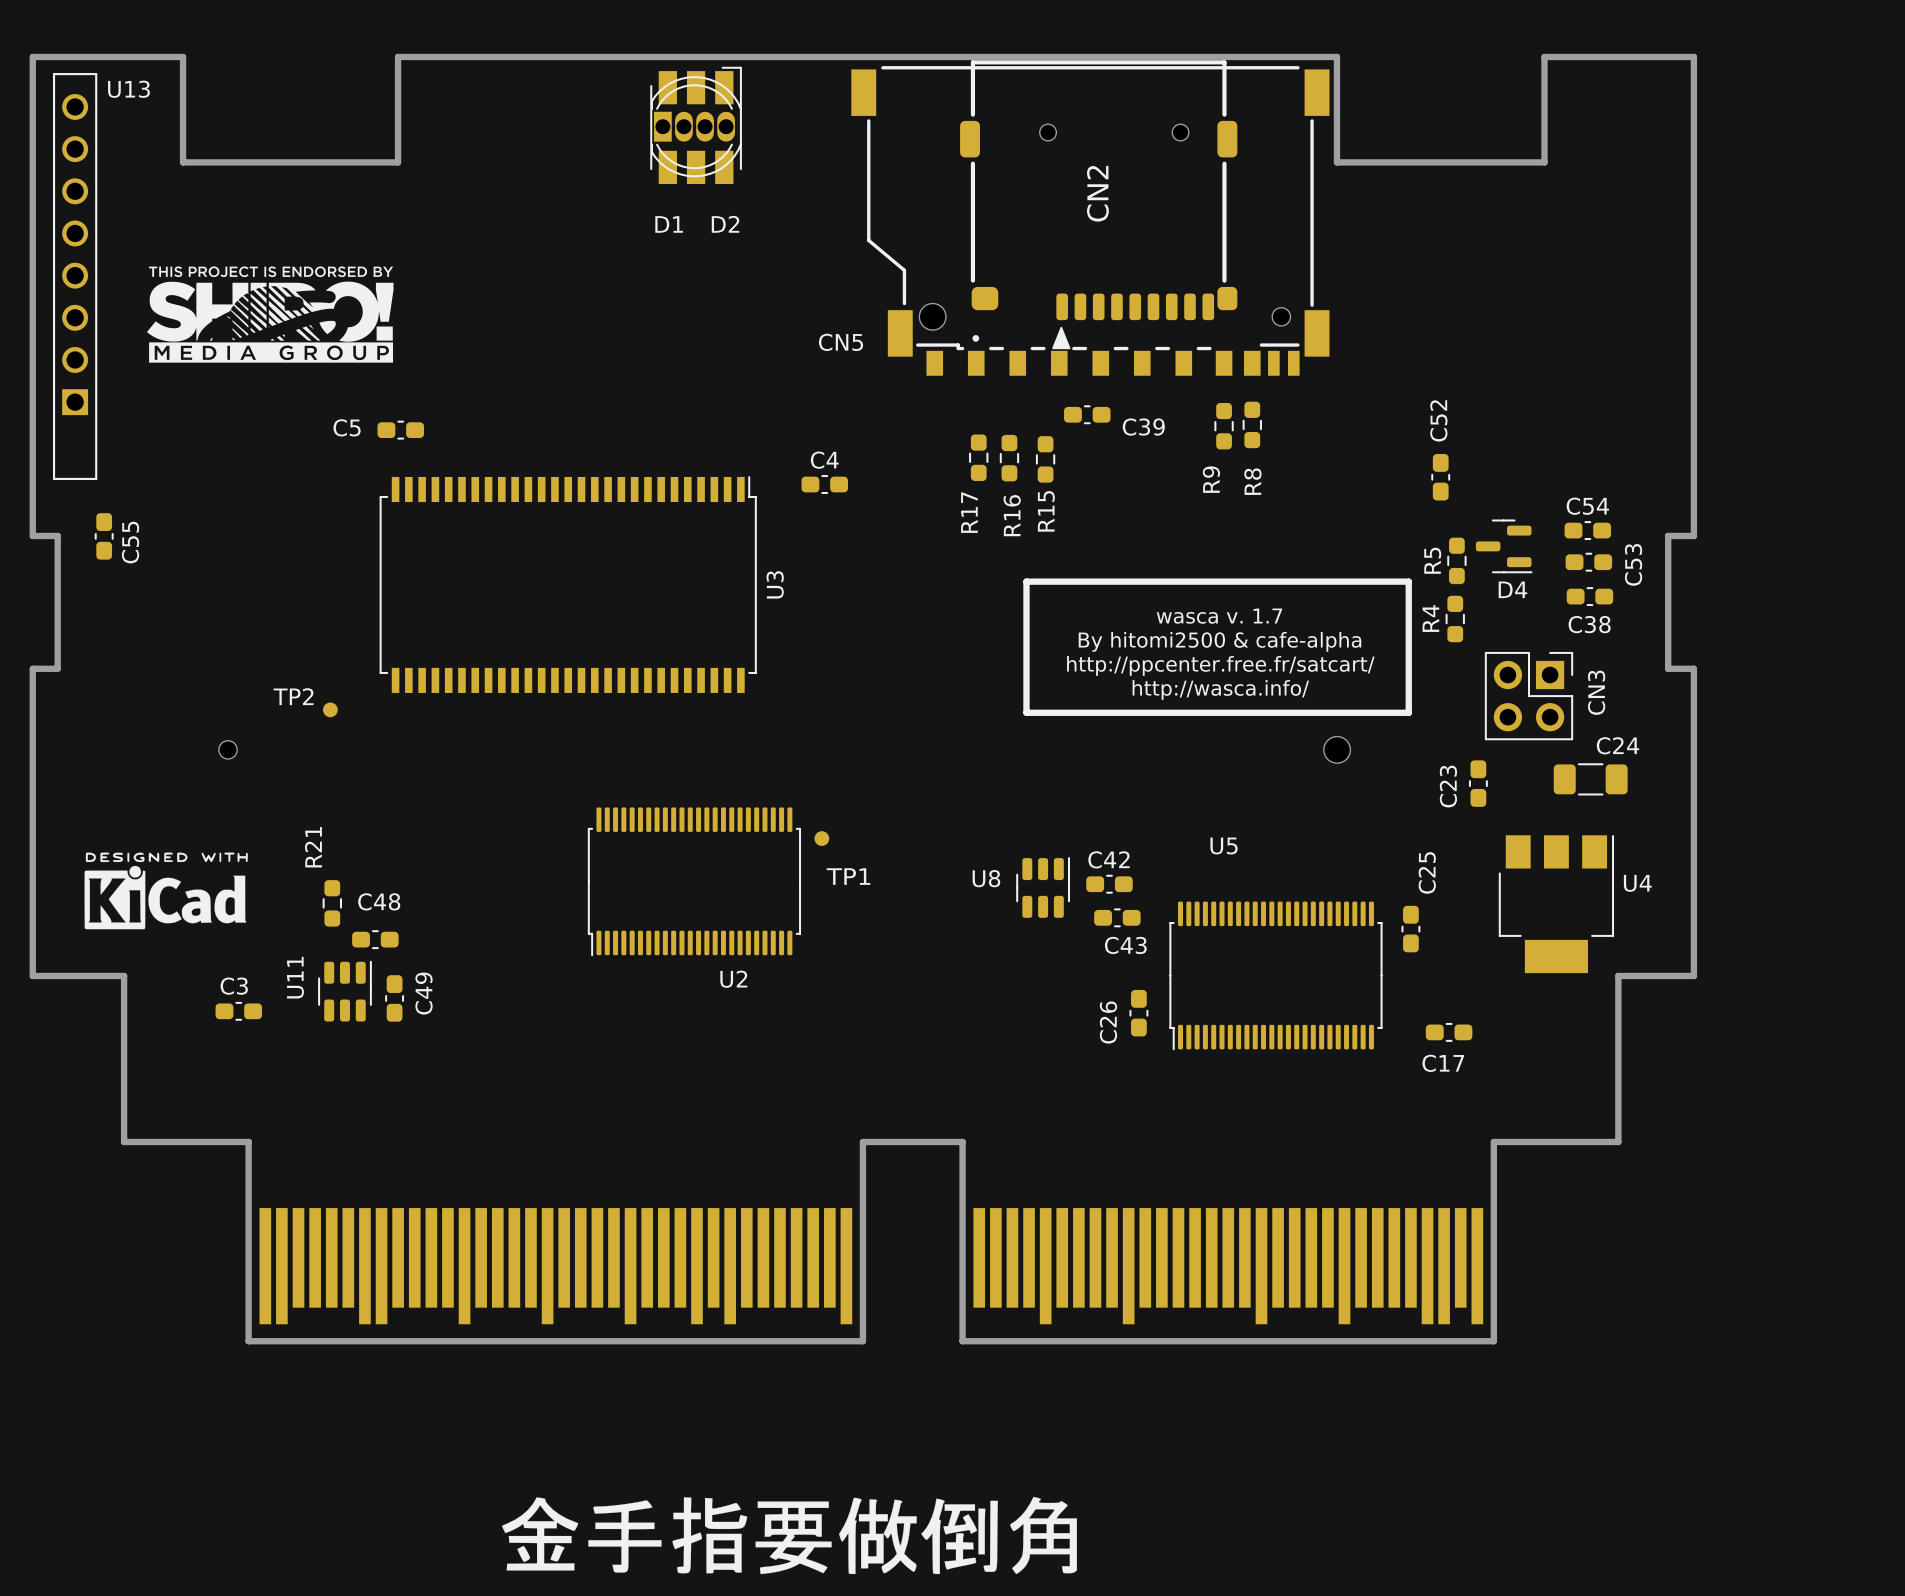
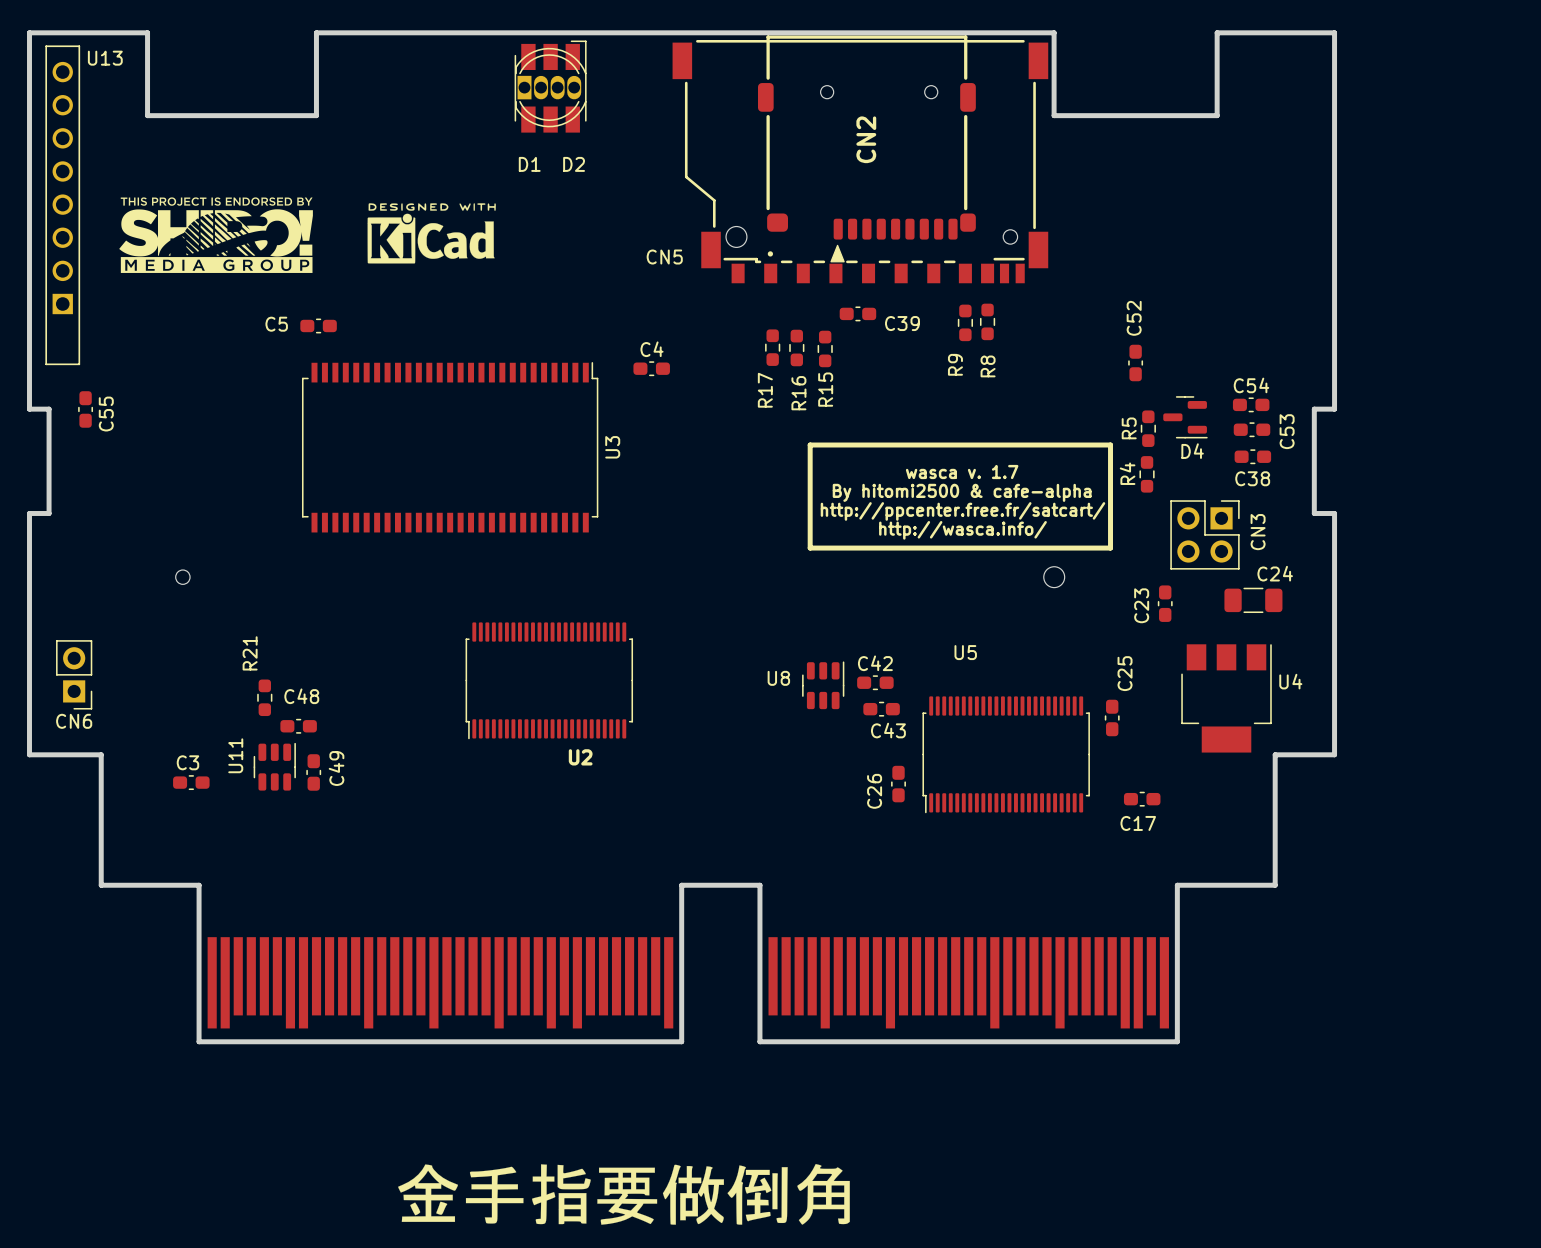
drawing: none -> [367, 203, 496, 264]
TP2: (330, 709) -> none
TP1: (821, 838) -> none
drawing: [84, 852, 248, 930] -> none
CN6: none -> (74, 674)

